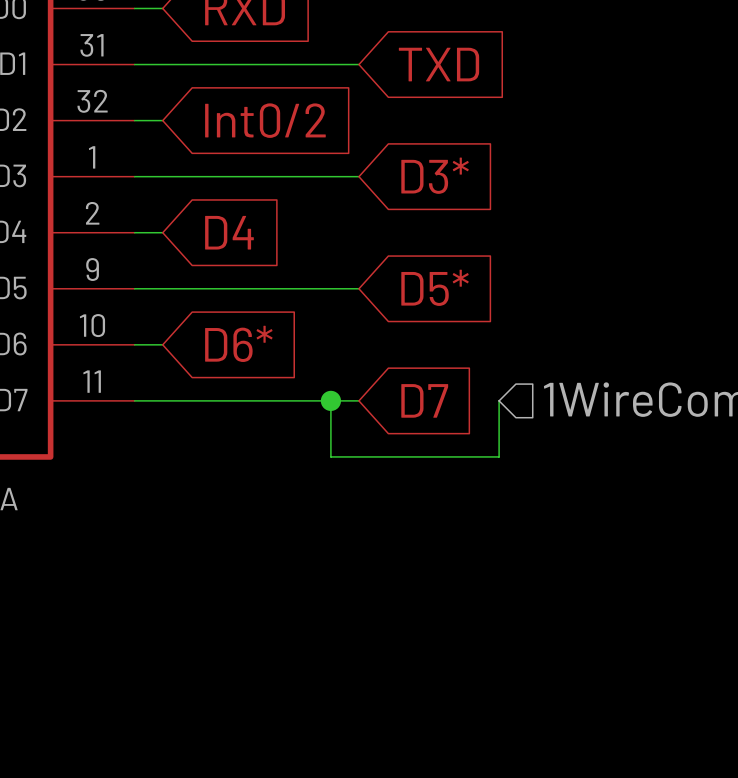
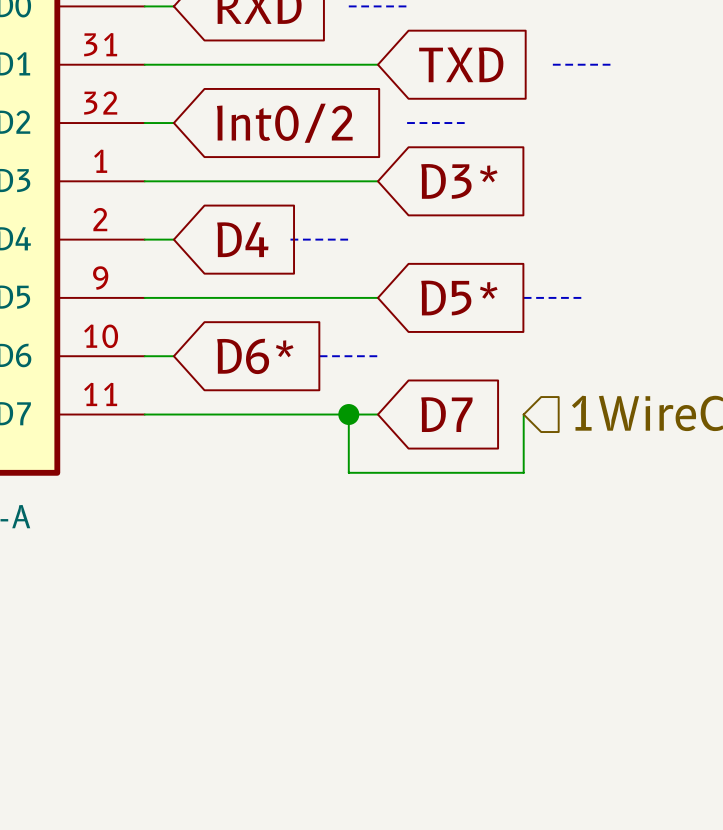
line: none -> (348, 6) (407, 6)
line: none -> (552, 64) (611, 64)
line: none -> (407, 123) (465, 123)
line: none -> (290, 239) (348, 239)
line: none -> (523, 297) (582, 297)
line: none -> (319, 356) (377, 356)

